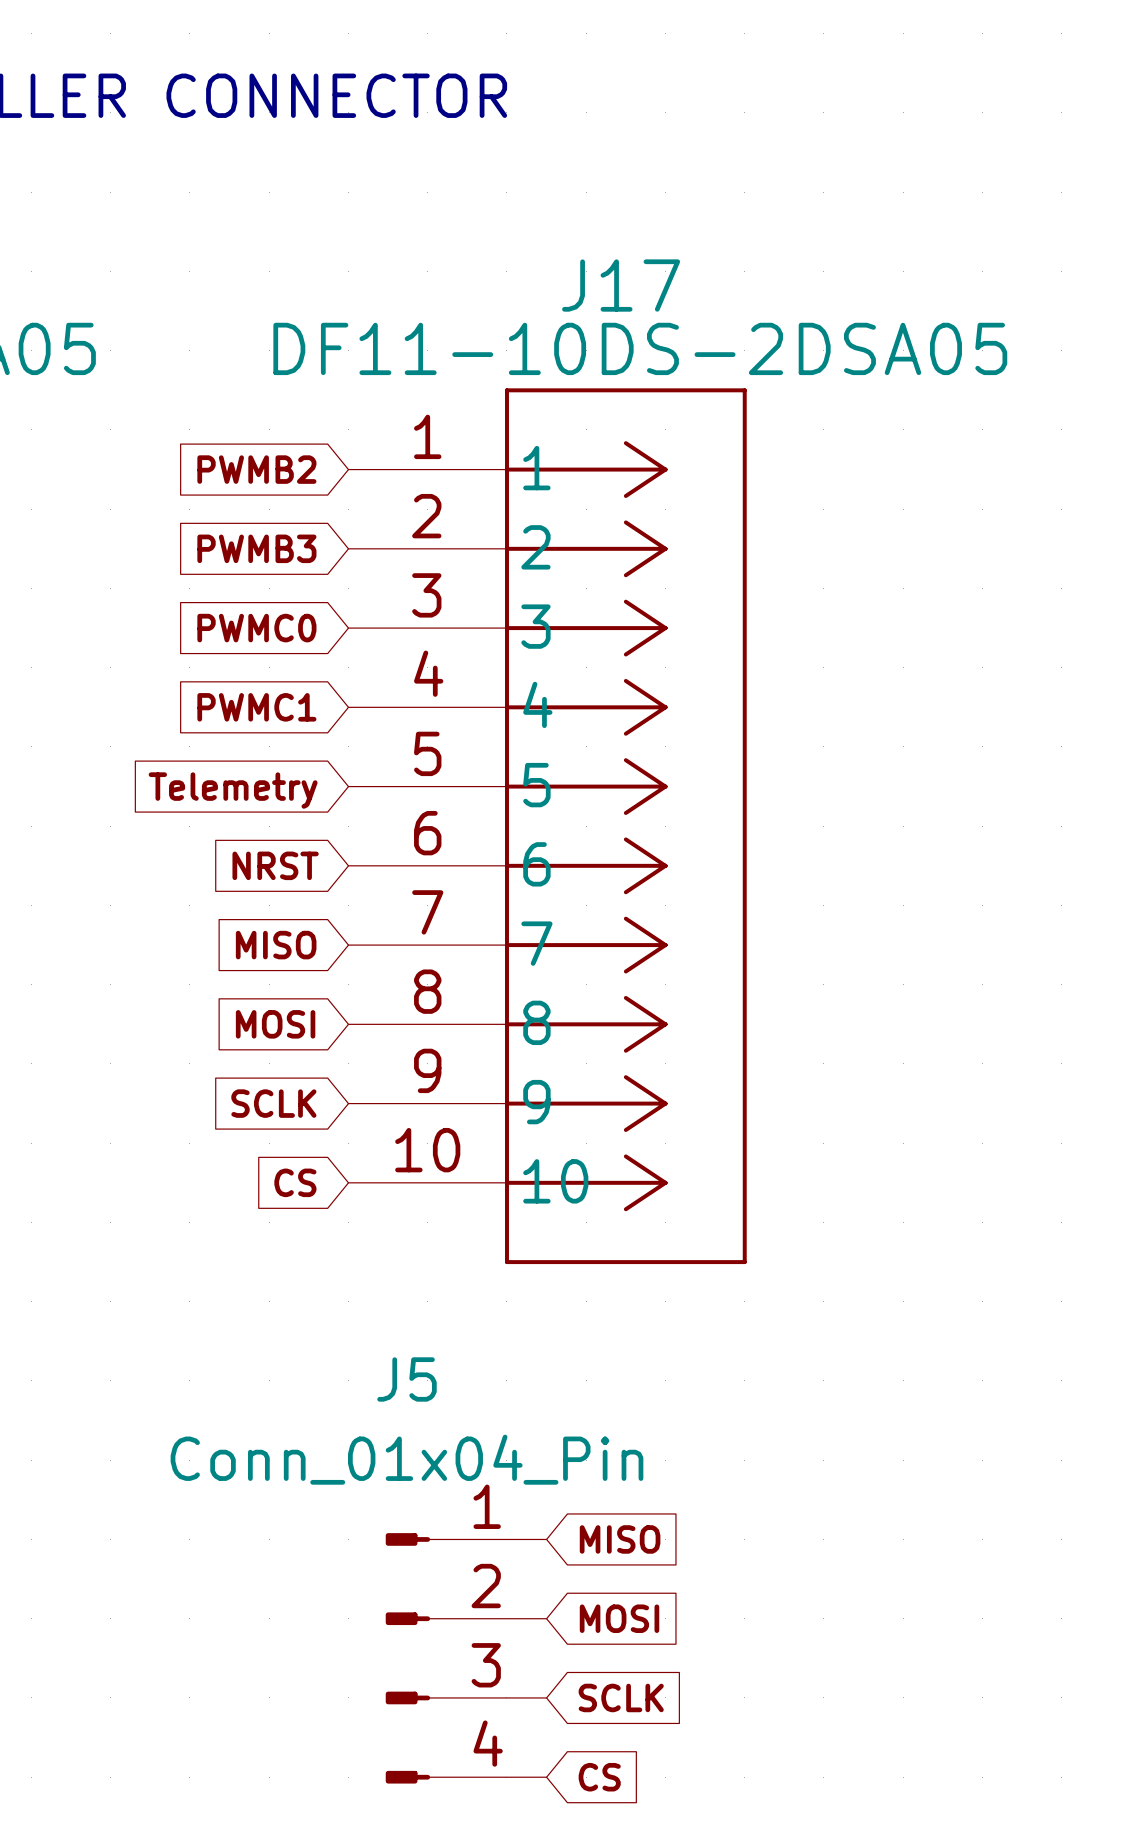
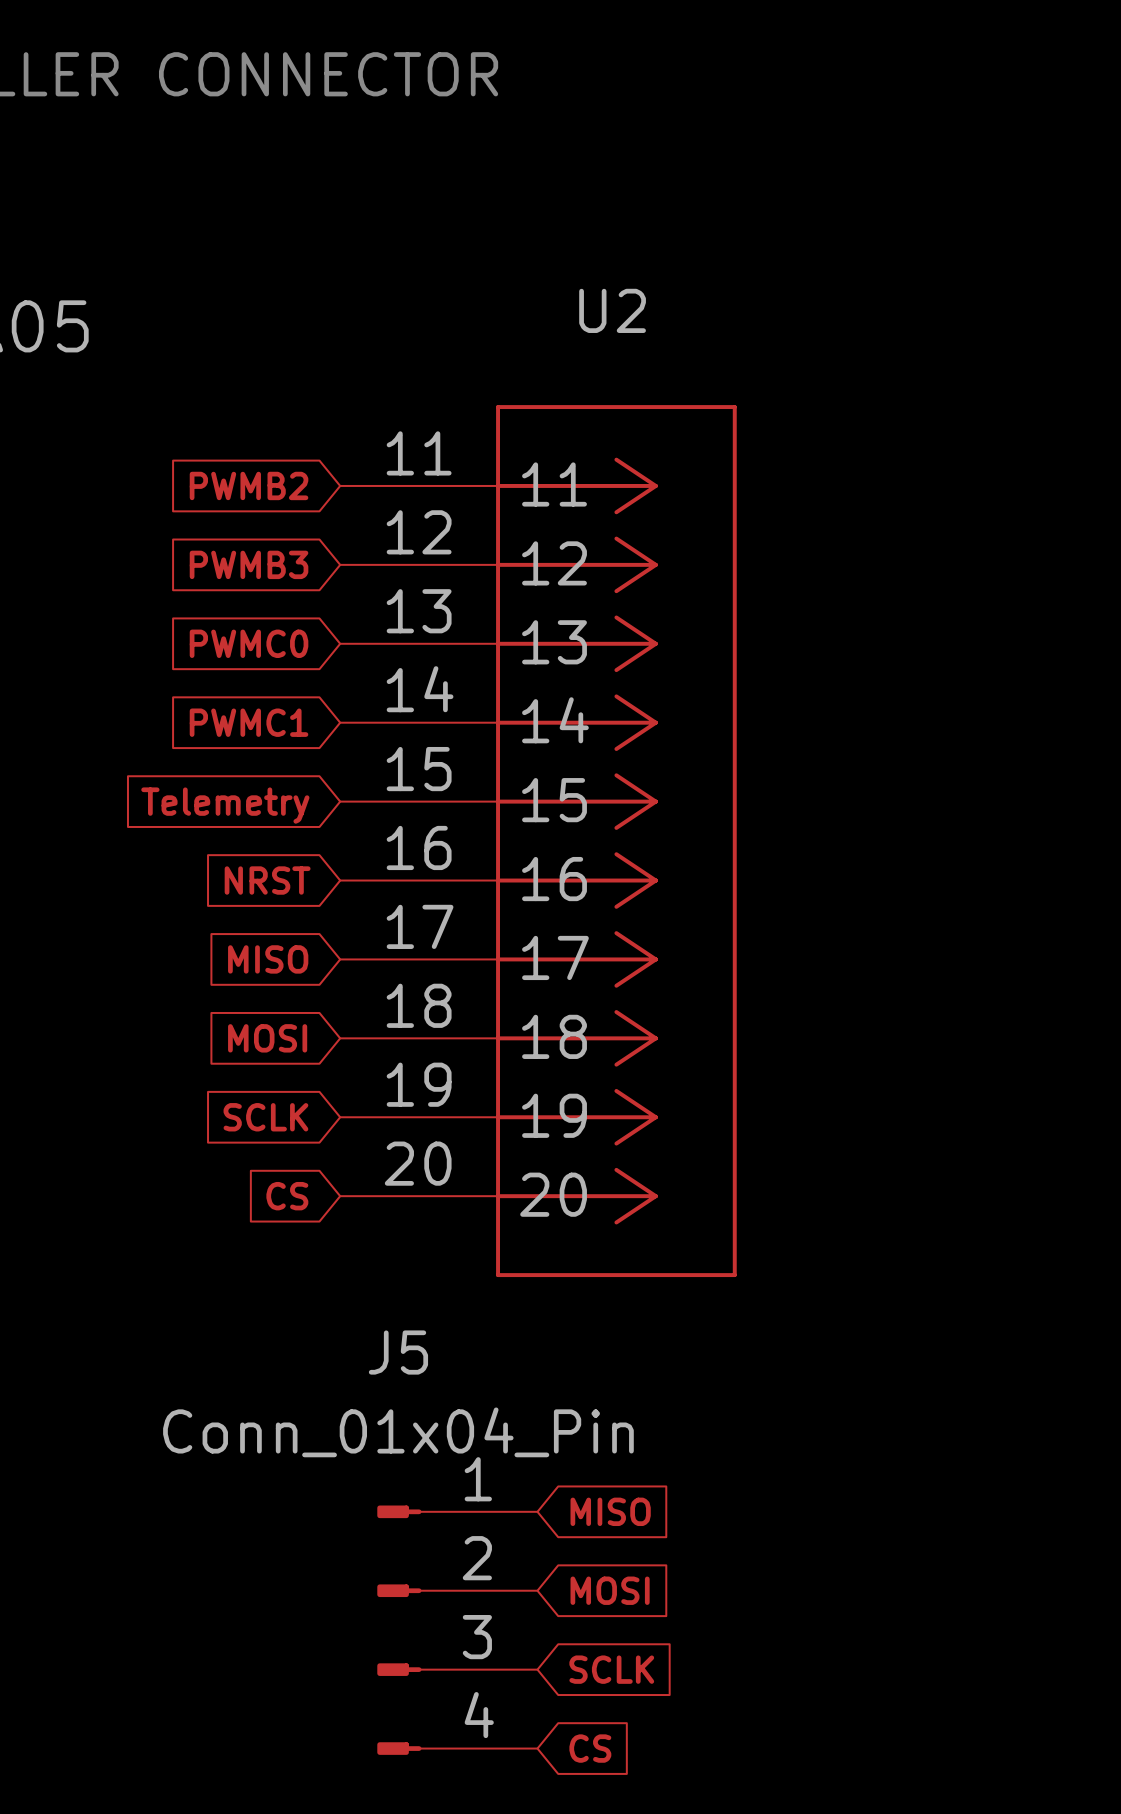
global label position: PWMB2 (256, 469) -> PWMB2 (249, 485)
global label position: PWMB3 (256, 548) -> PWMB3 (249, 564)
global label position: PWMC0 (256, 628) -> PWMC0 (249, 643)
global label position: PWMC1 (256, 707) -> PWMC1 (249, 722)
global label position: Telemetry (233, 790) -> Telemetry (225, 805)
J17: DF11-10DS-2DSA05 (547, 826) -> none
global label position: NRST (275, 865) -> NRST (267, 880)
U2: none -> (538, 841)
global label position: MISO (276, 945) -> MISO (268, 959)
global label position: MOSI (275, 1024) -> MOSI (267, 1038)
global label position: SCLK (273, 1103) -> SCLK (265, 1117)
global label position: CS (295, 1182) -> CS (287, 1196)

